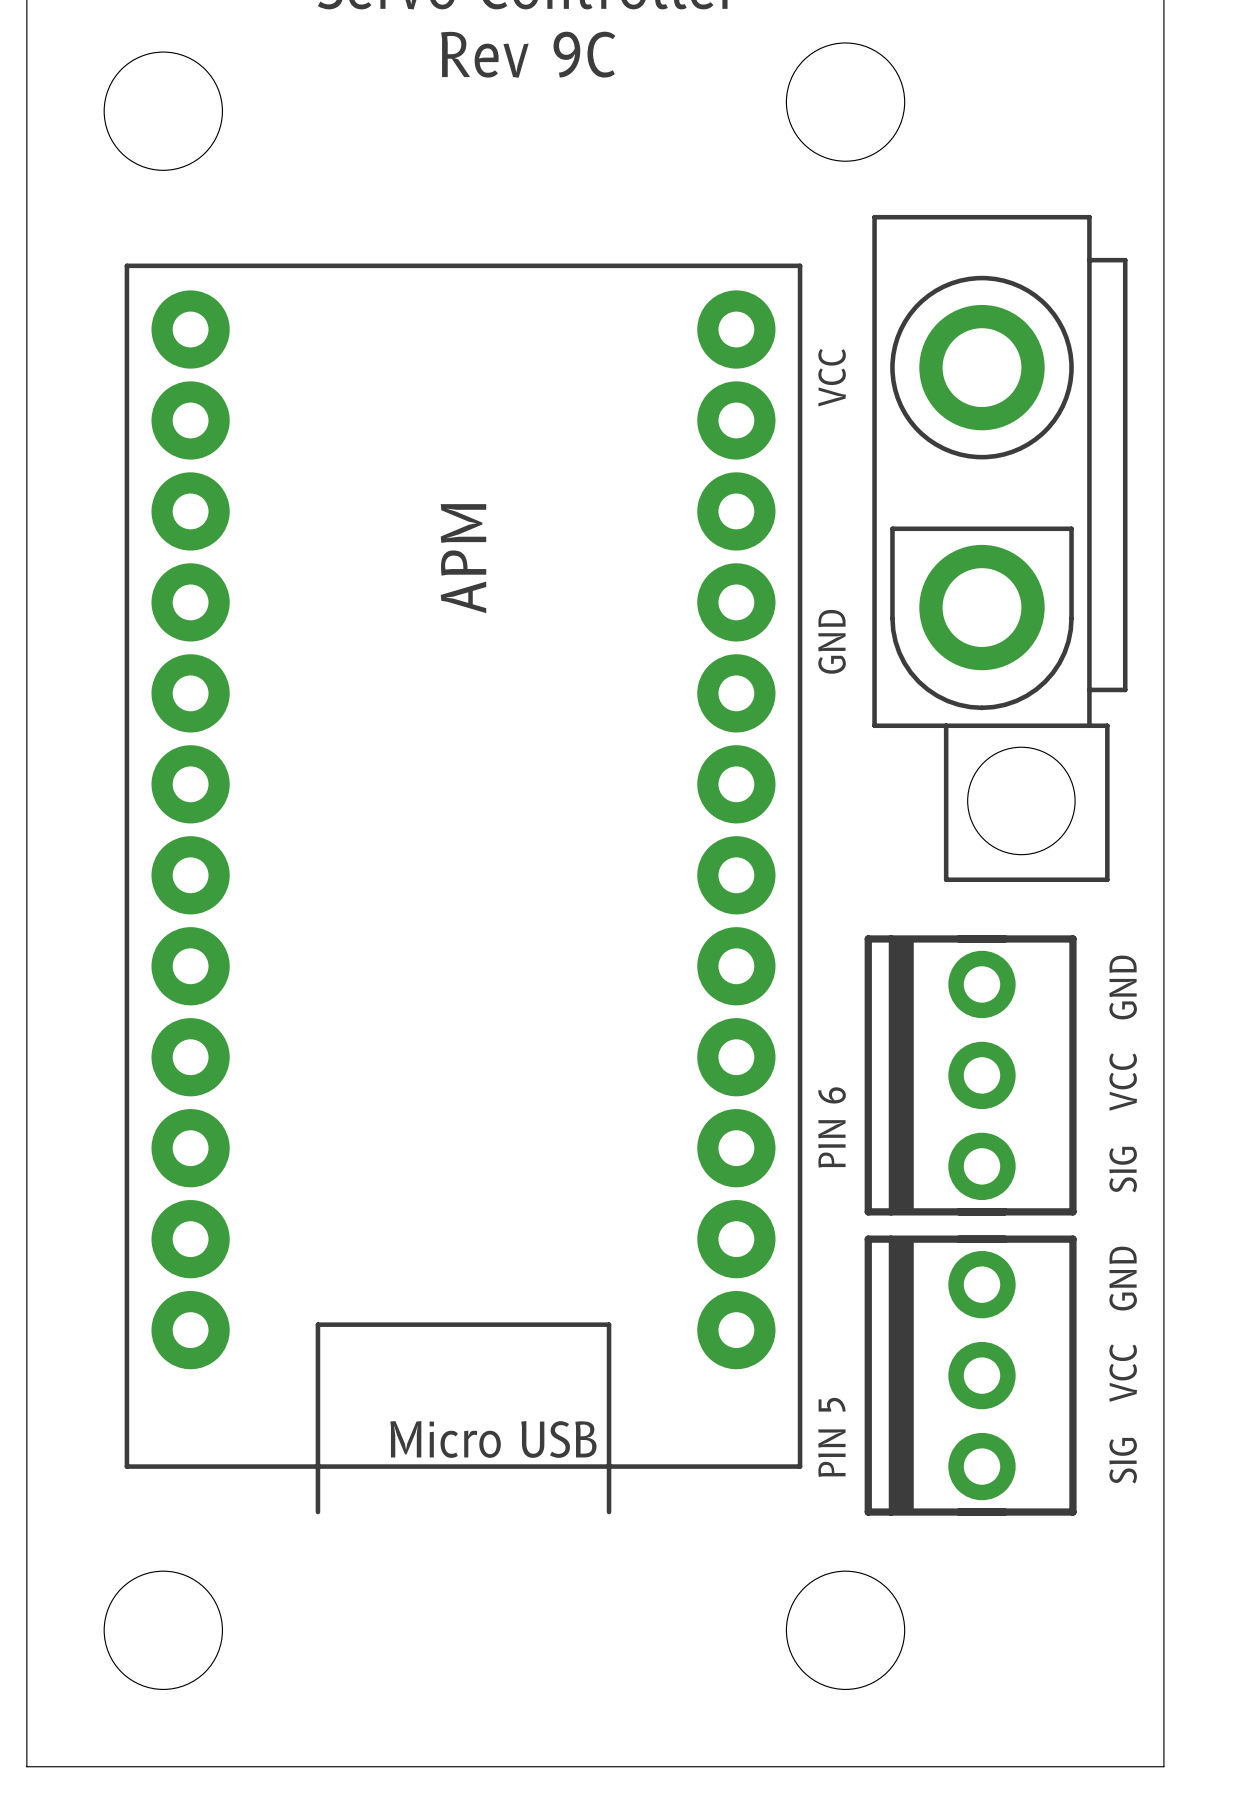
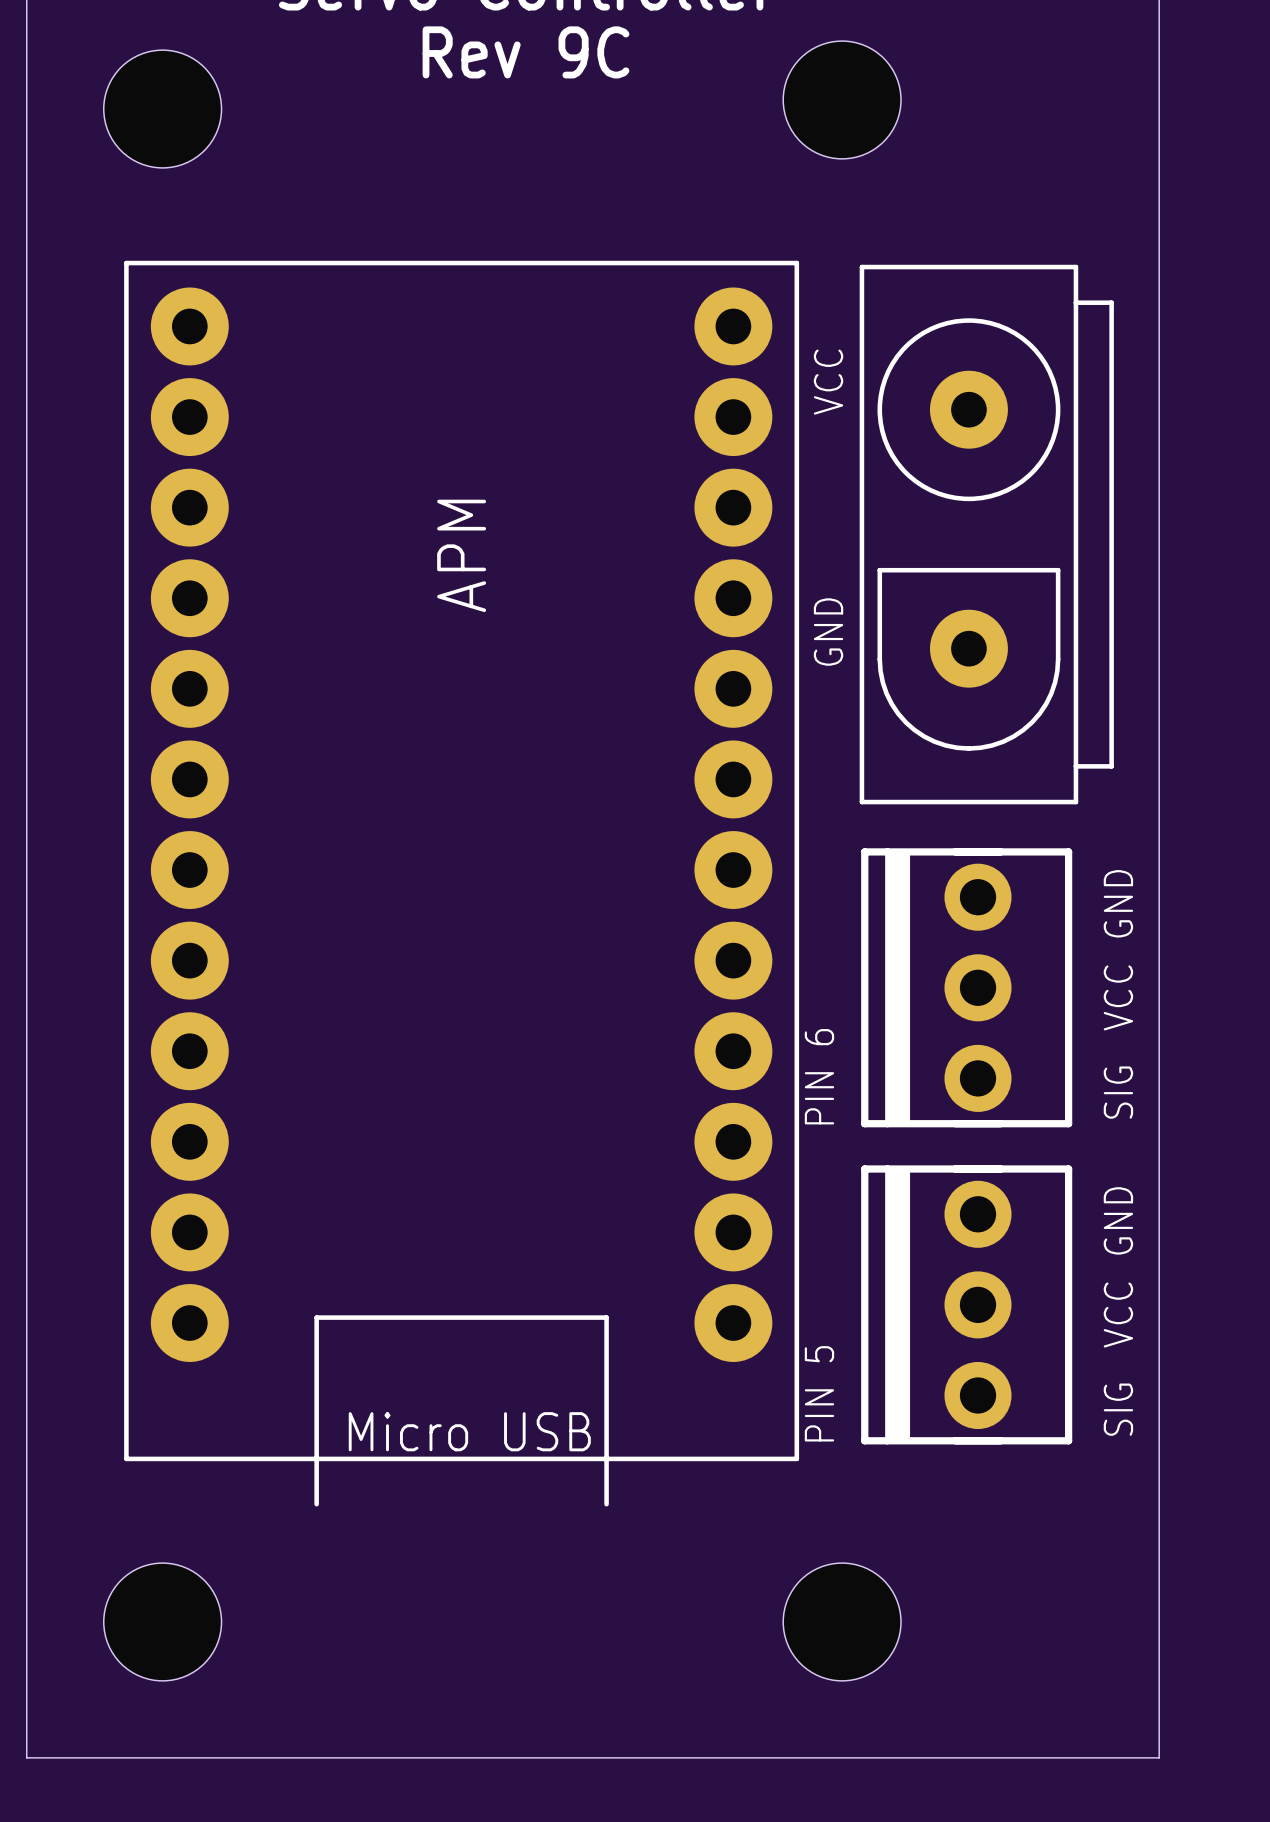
part footprint: [872, 214, 1128, 883] -> [859, 264, 1114, 805]
text: none -> GND (1118, 903)
text: GND (1123, 987) -> VCC (1118, 997)
part position: (970, 1075) -> (966, 987)
text: VCC (1123, 1081) -> SIG (1118, 1092)
text position: PIN 6 (832, 1127) -> PIN 6 (819, 1076)
text: SIG (1123, 1169) -> none
text position: GND (1123, 1278) -> GND (1118, 1220)
text position: VCC (1123, 1373) -> VCC (1118, 1314)
part position: (970, 1375) -> (966, 1304)
text position: PIN 5 (831, 1437) -> PIN 5 (819, 1393)
text position: SIG (1123, 1460) -> SIG (1118, 1409)

